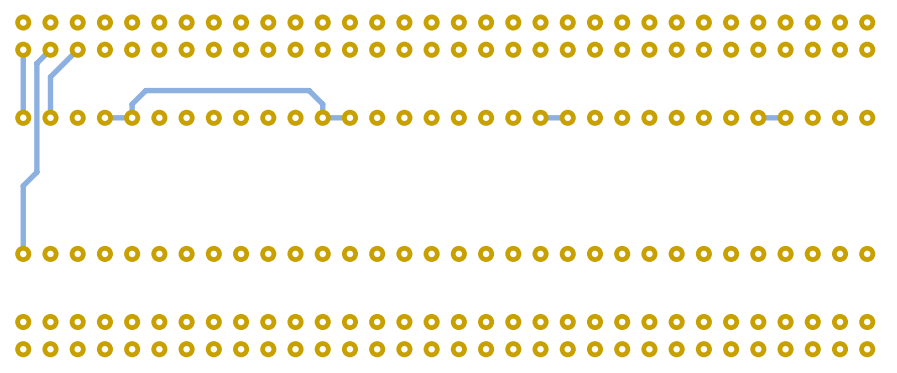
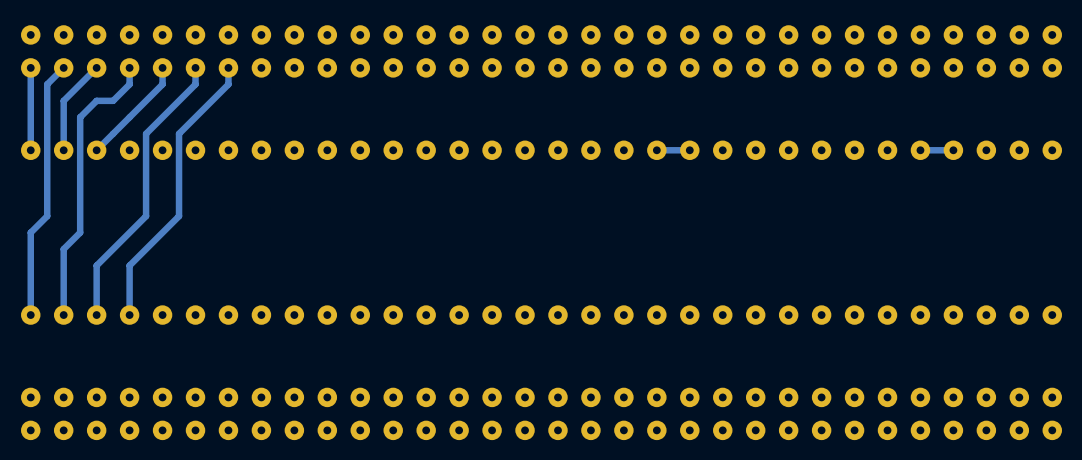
track: none -> (129, 67) (129, 84) (113, 100) (96, 100) (80, 117) (80, 232) (63, 249) (63, 315)
track: none -> (162, 67) (162, 84) (96, 150)
track: none -> (195, 67) (195, 84) (146, 133) (146, 216) (96, 265) (96, 315)
track: none -> (228, 67) (228, 84) (179, 133) (179, 216) (129, 265) (129, 315)
track: (349, 117) (322, 117) (322, 104) (309, 90) (145, 90) (132, 104) (132, 117) (104, 117) -> none

